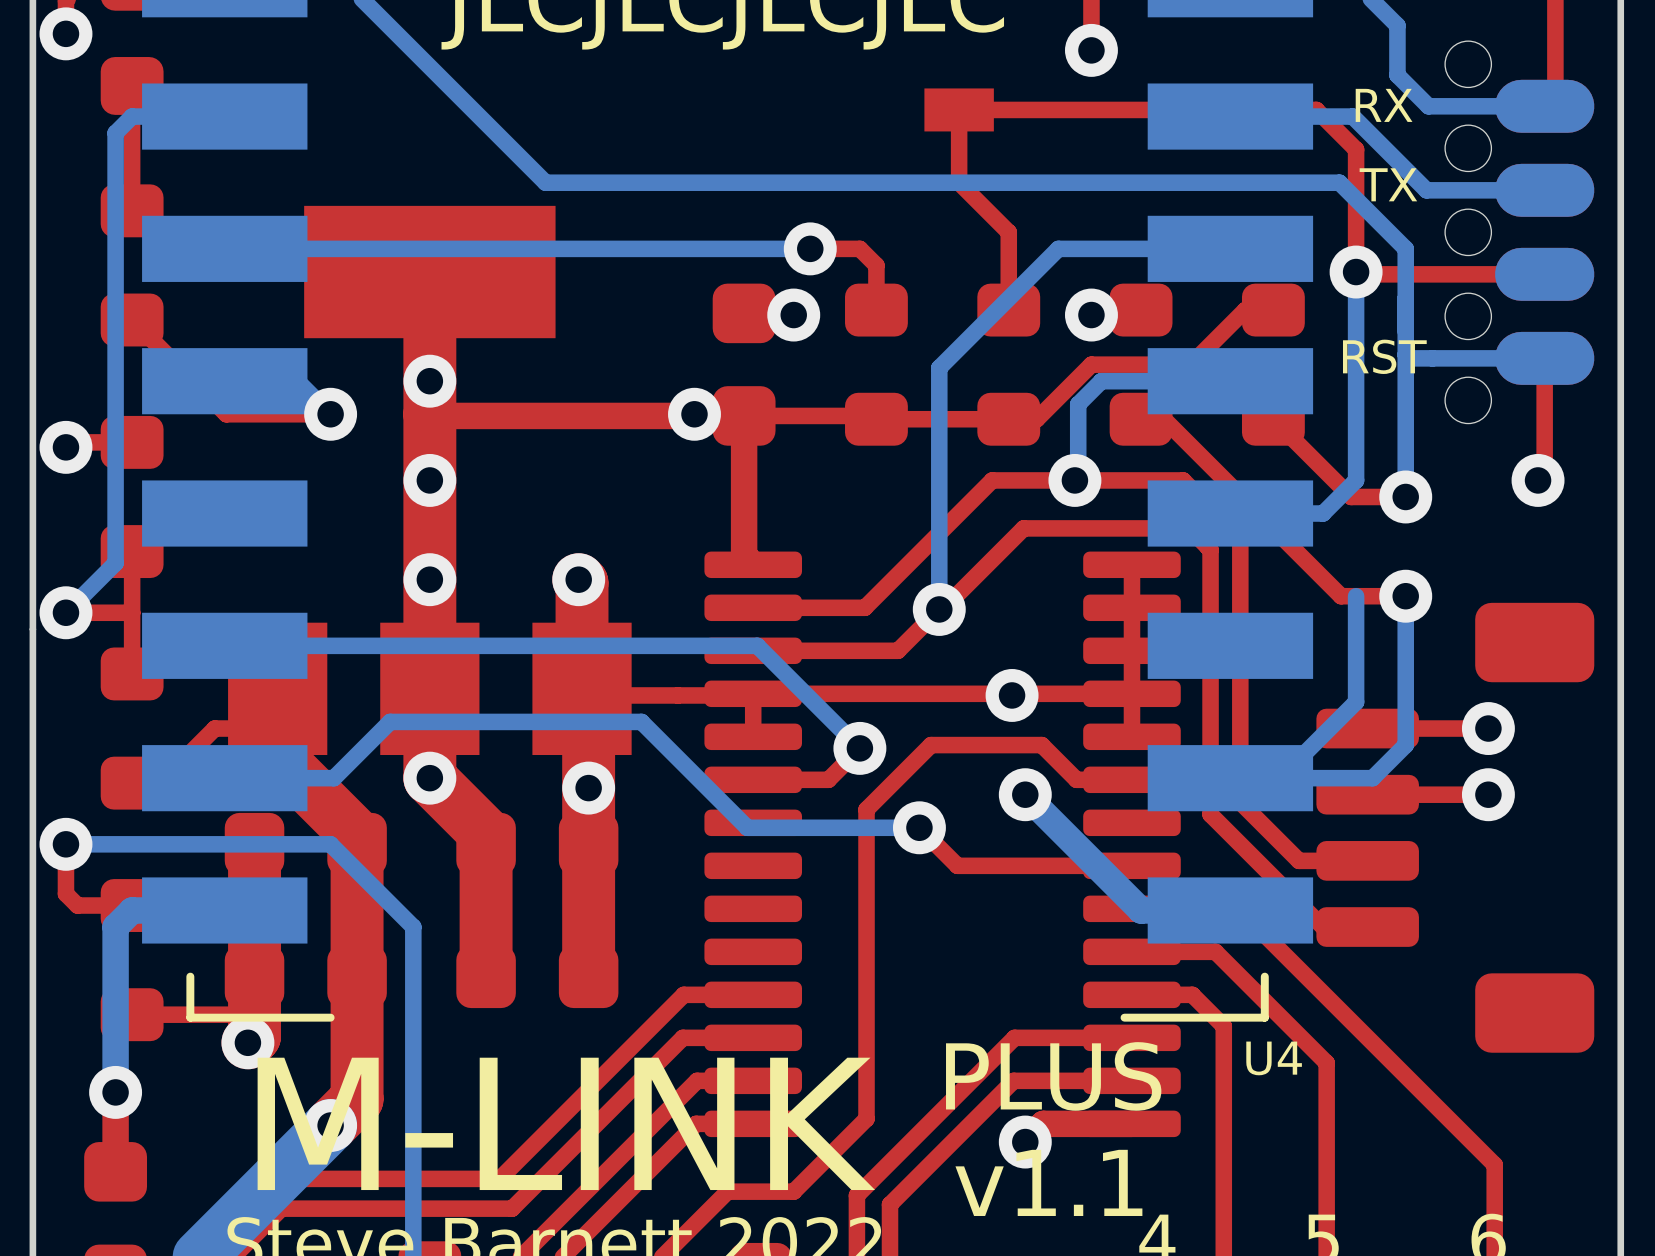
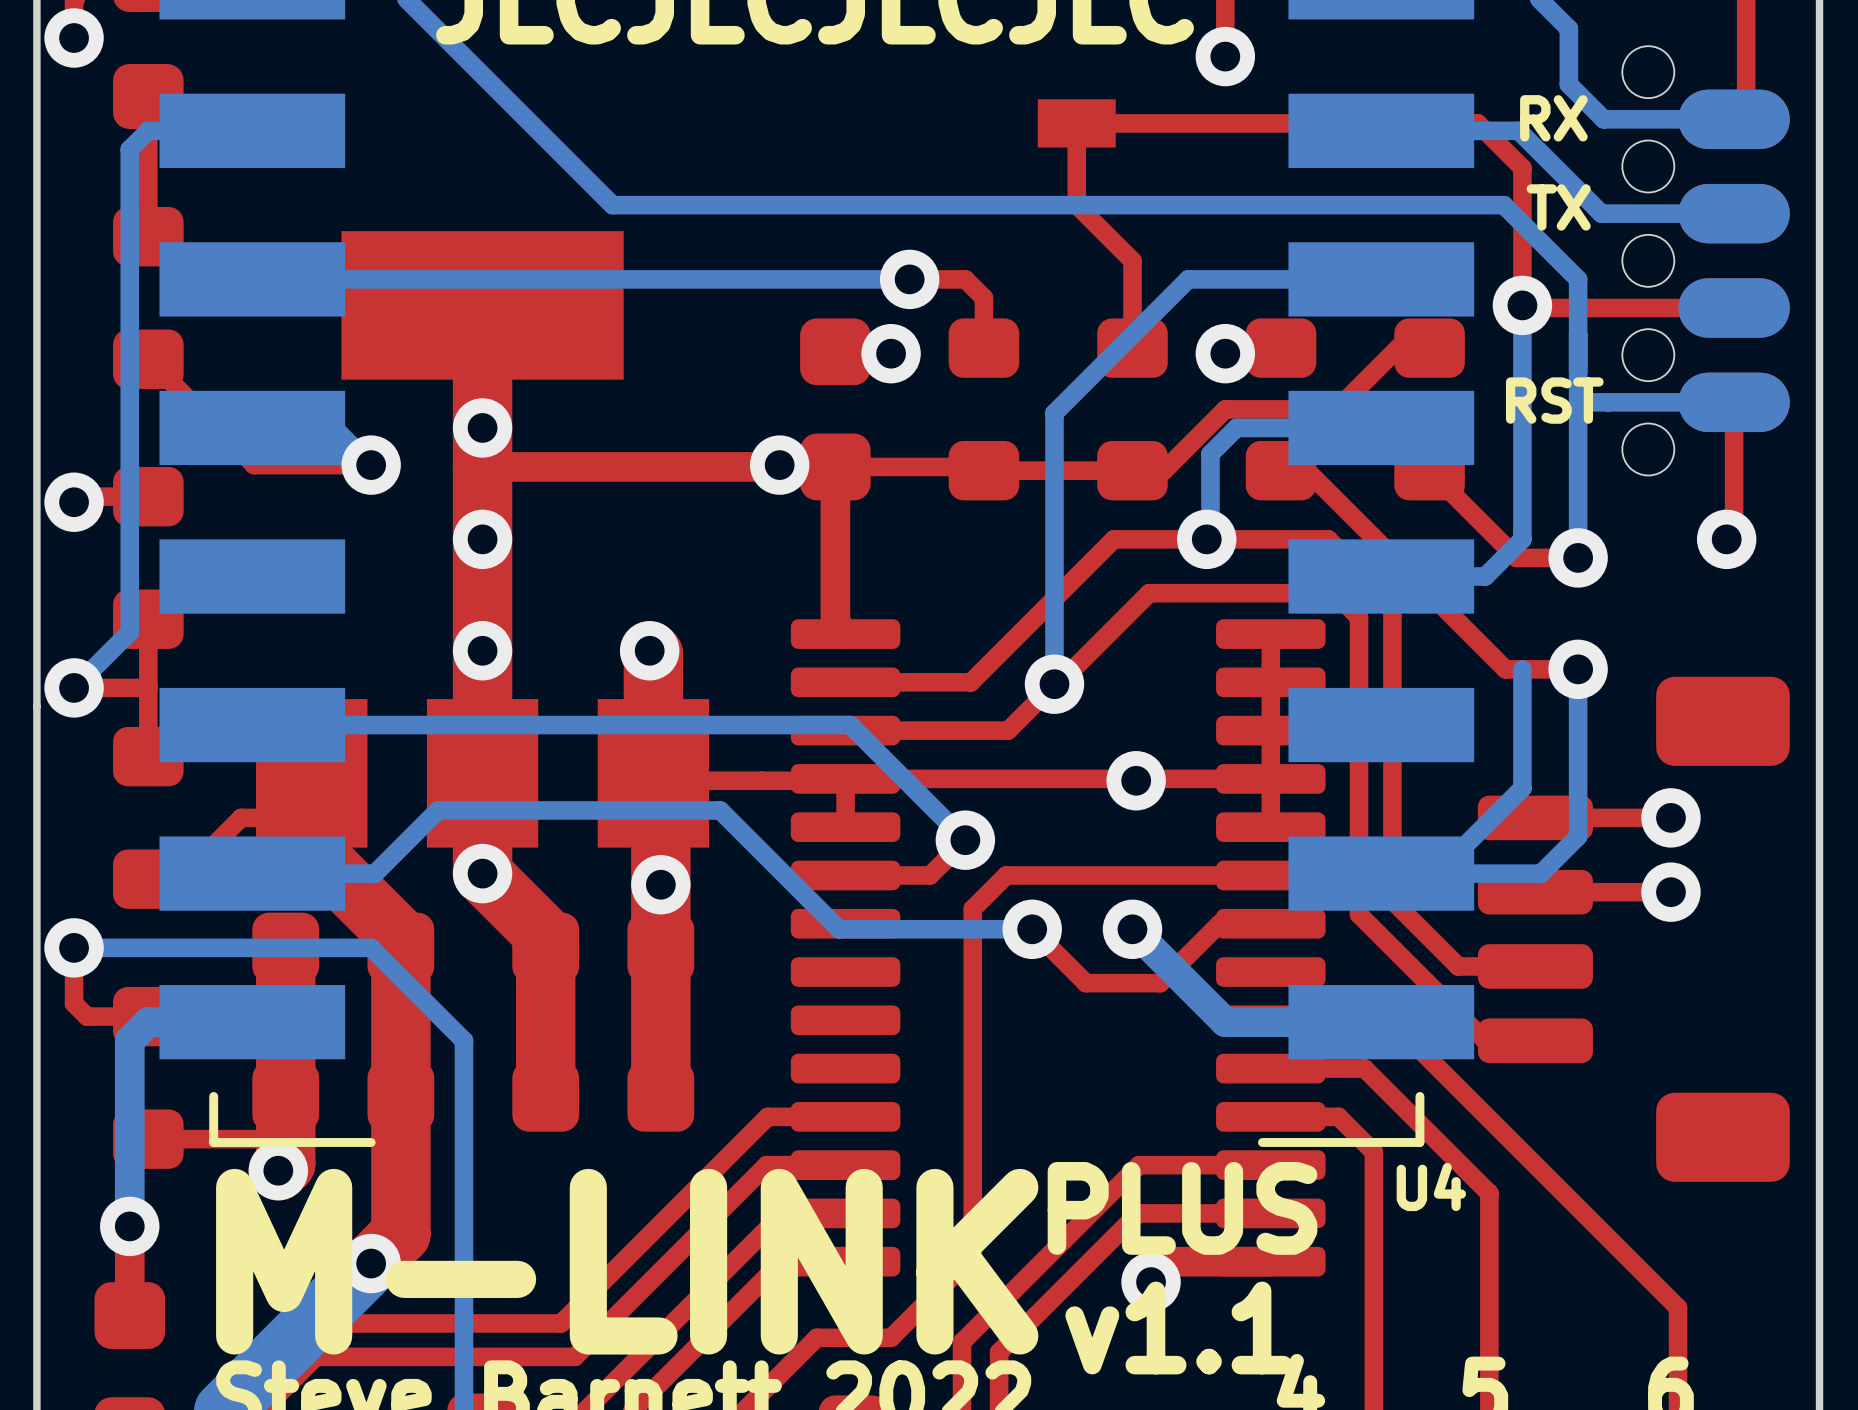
top track: (1076, 779) (1041, 745) (931, 745) (896, 779) -> (1208, 875) (1006, 875)
bottom track: (1025, 794) (1141, 910) -> (1132, 929) (1225, 1022) (1281, 1022)
via position: (1025, 794) -> (1132, 929)
top track: (1131, 865) (957, 865) -> (1270, 923) (1219, 923) (1160, 983) (1086, 983) (1074, 972)

